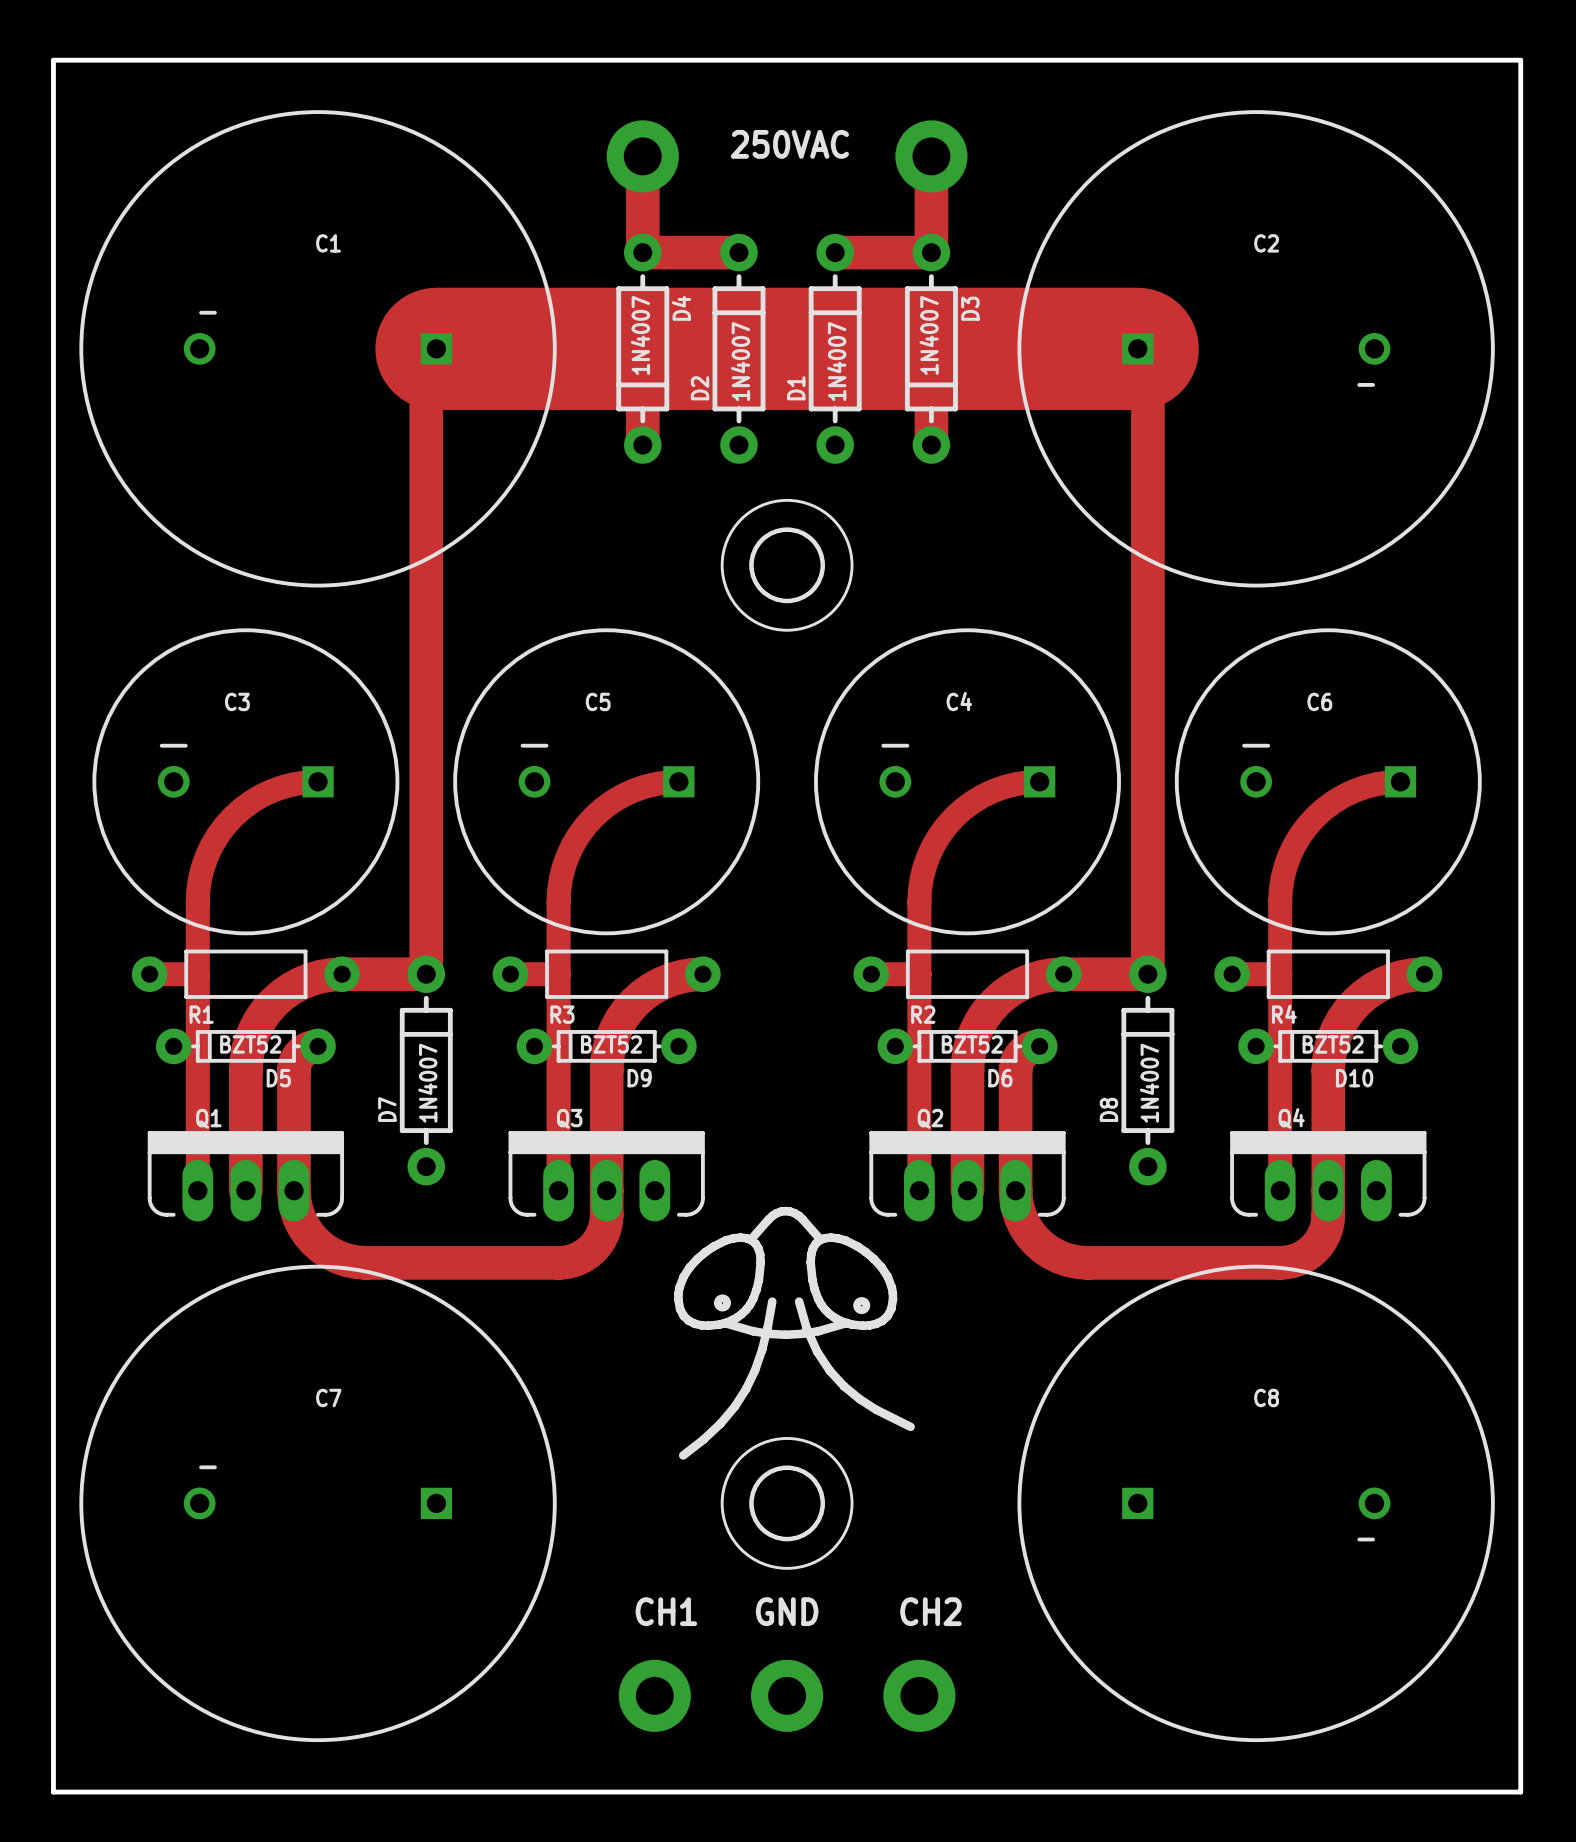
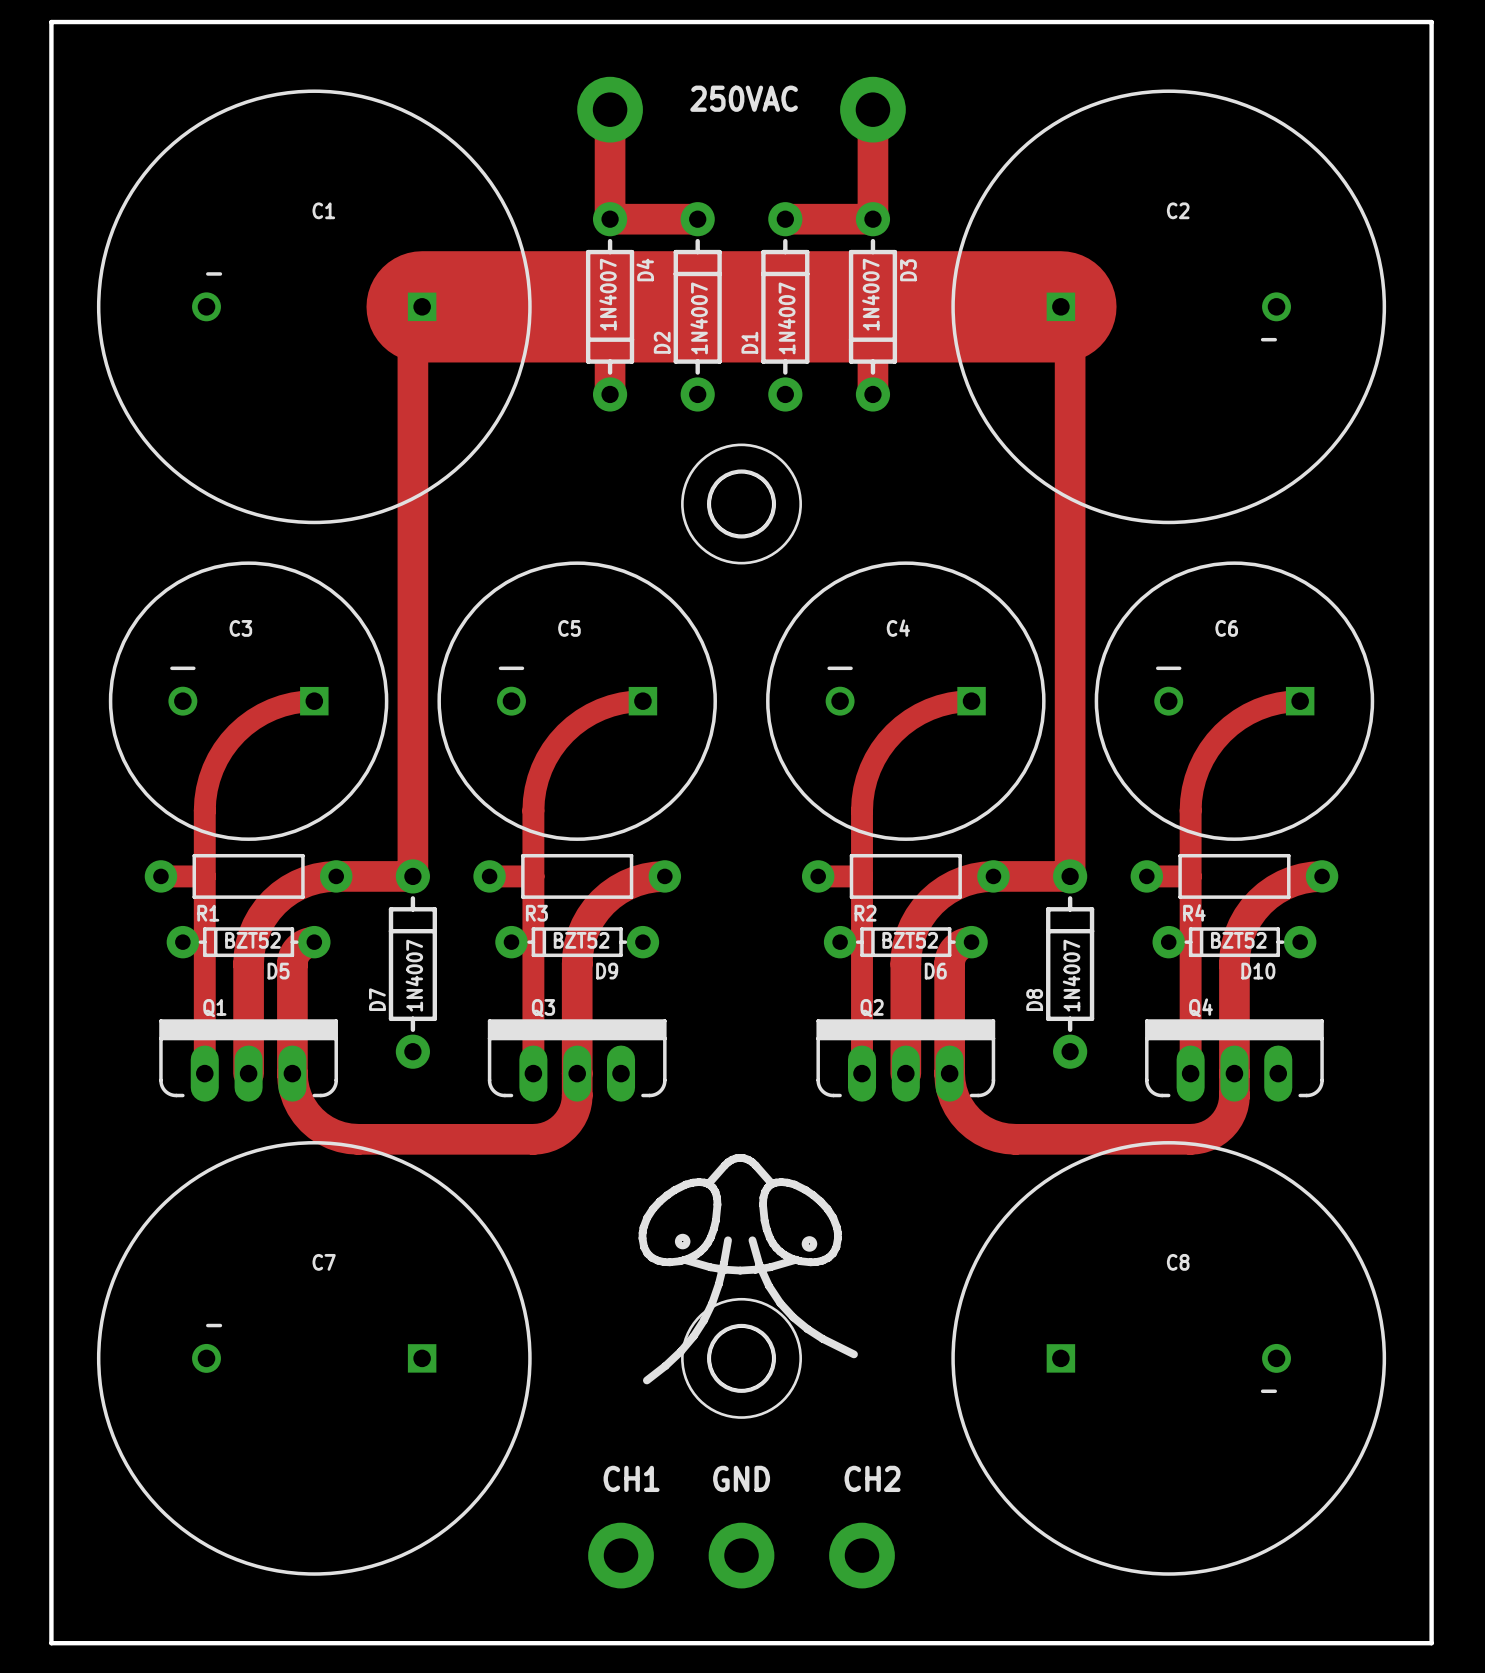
board edge: (53, 60) (1520, 60) (1520, 1792) (53, 1792) (53, 60) -> (51, 22) (51, 1643) (1431, 1643) (1431, 22) (51, 22)
text position: 250VAC (789, 144) -> 250VAC (744, 98)
part position: (642, 156) -> (610, 109)
part position: (931, 156) -> (872, 109)
drawing position: (794, 1333) -> (748, 1269)
text position: CH1 (666, 1611) -> CH1 (631, 1478)
text position: GND (787, 1611) -> GND (741, 1478)
text position: CH2 (930, 1611) -> CH2 (872, 1478)
part position: (654, 1695) -> (621, 1555)
part position: (787, 1695) -> (741, 1555)
part position: (919, 1695) -> (862, 1555)

